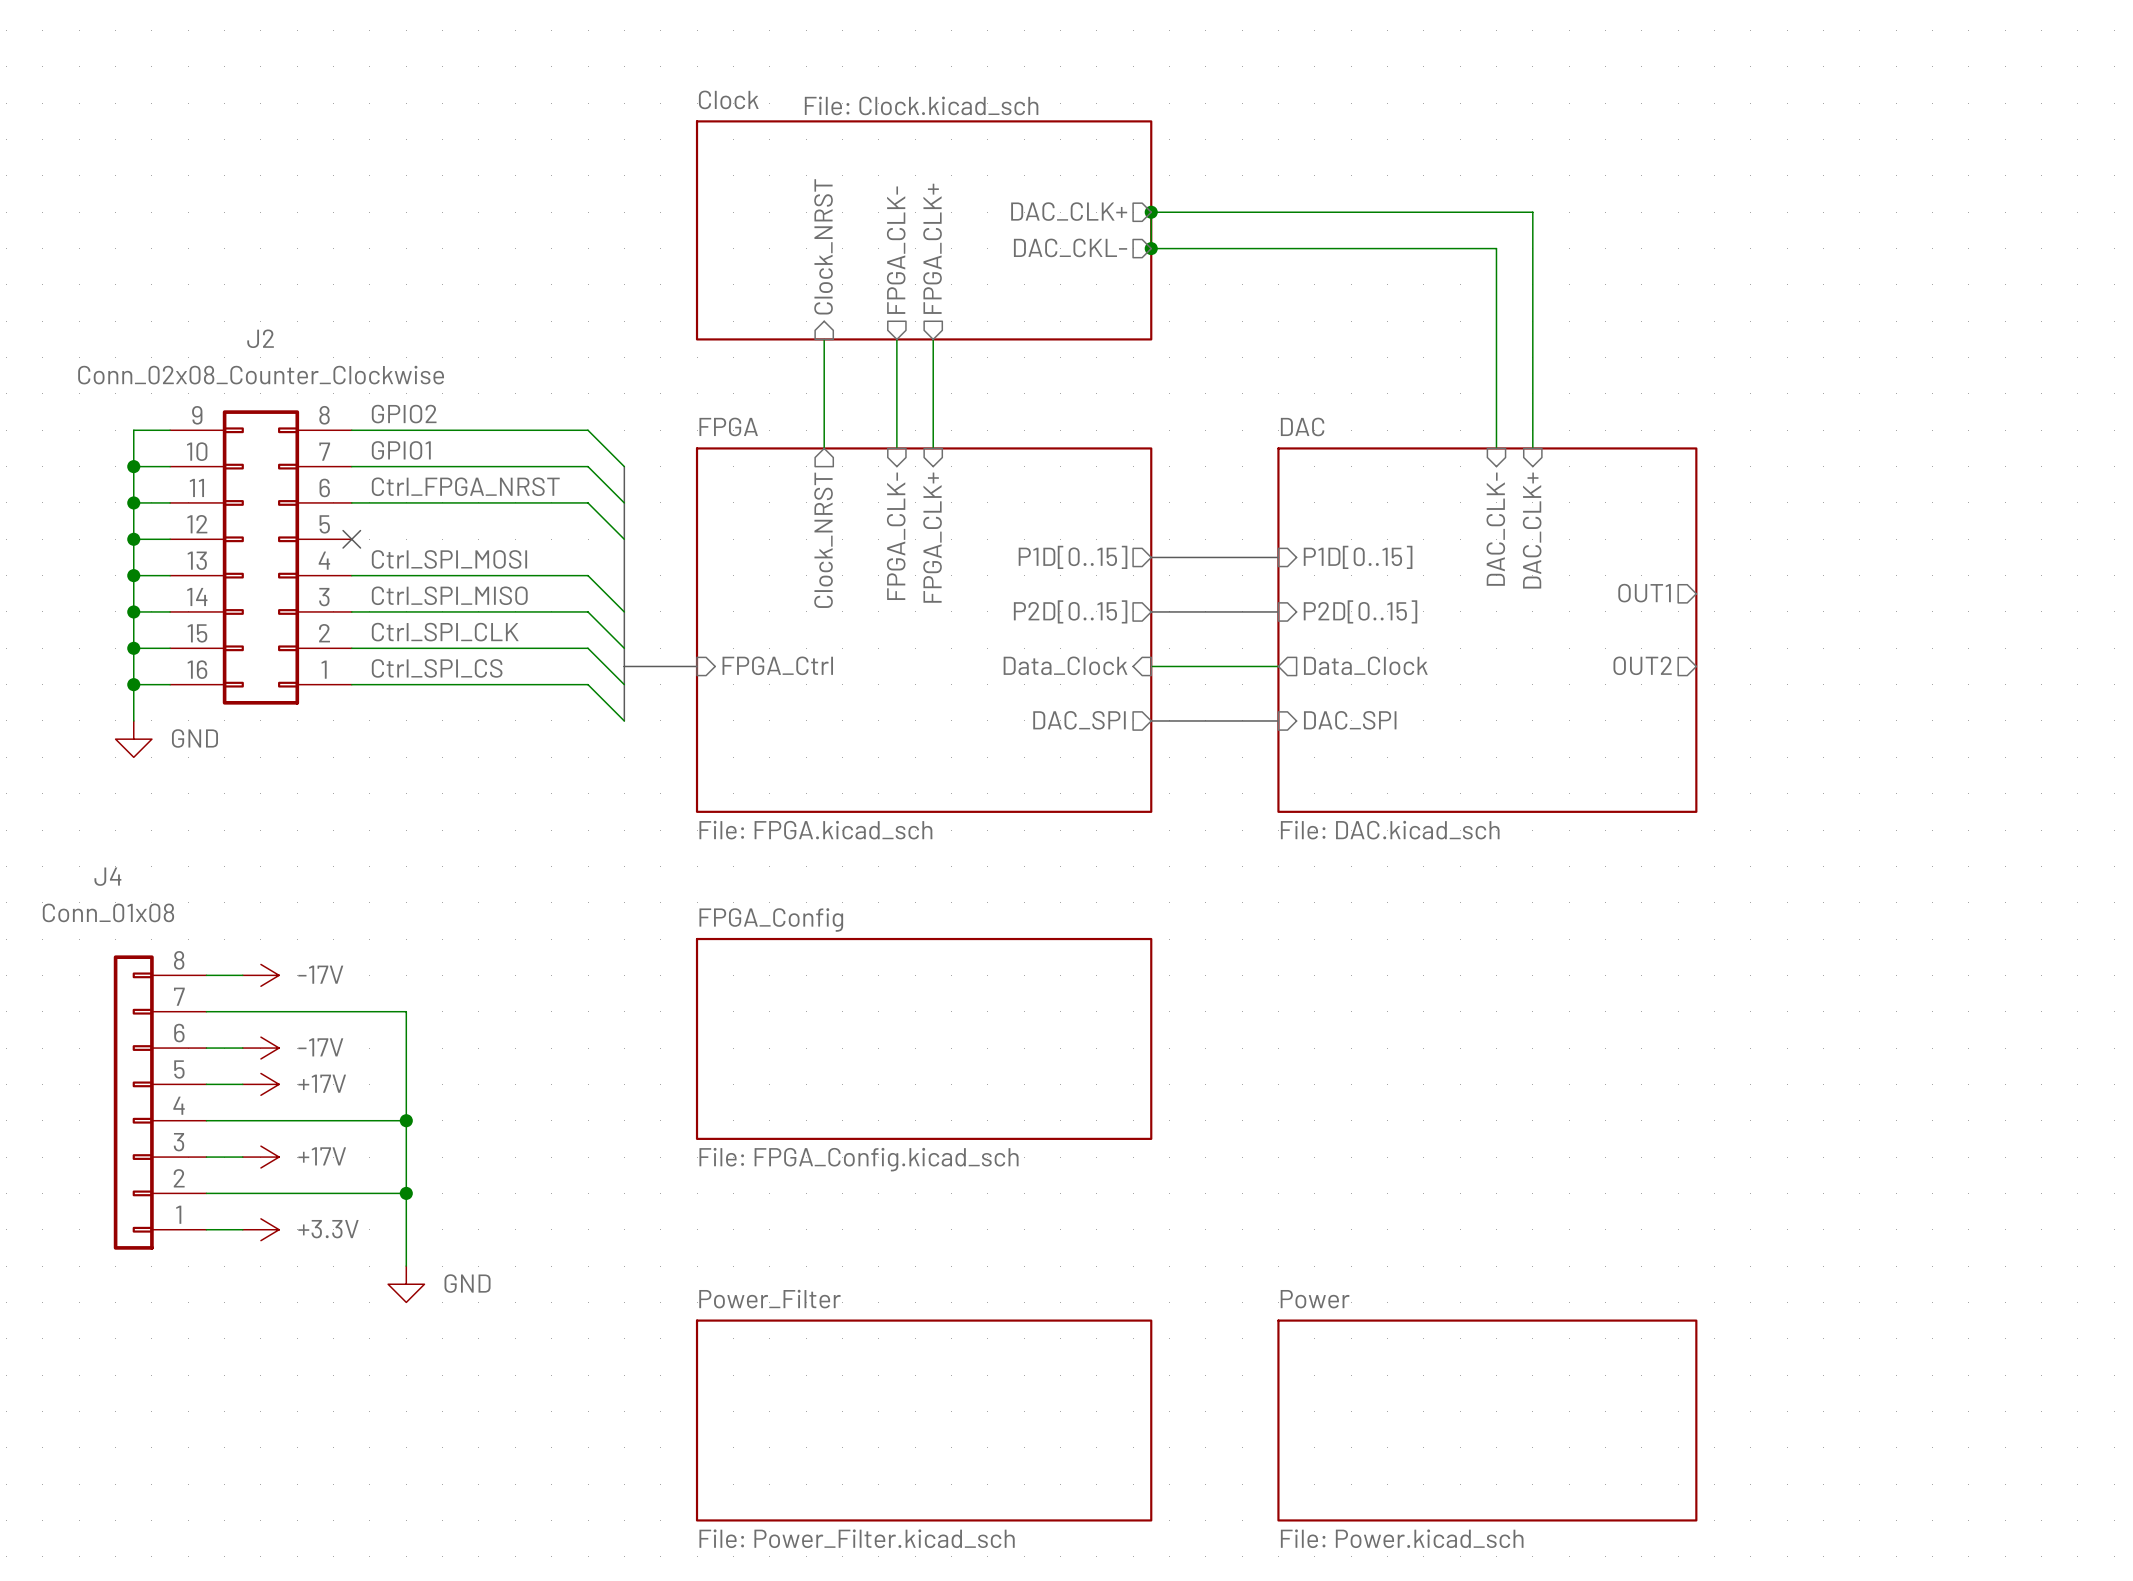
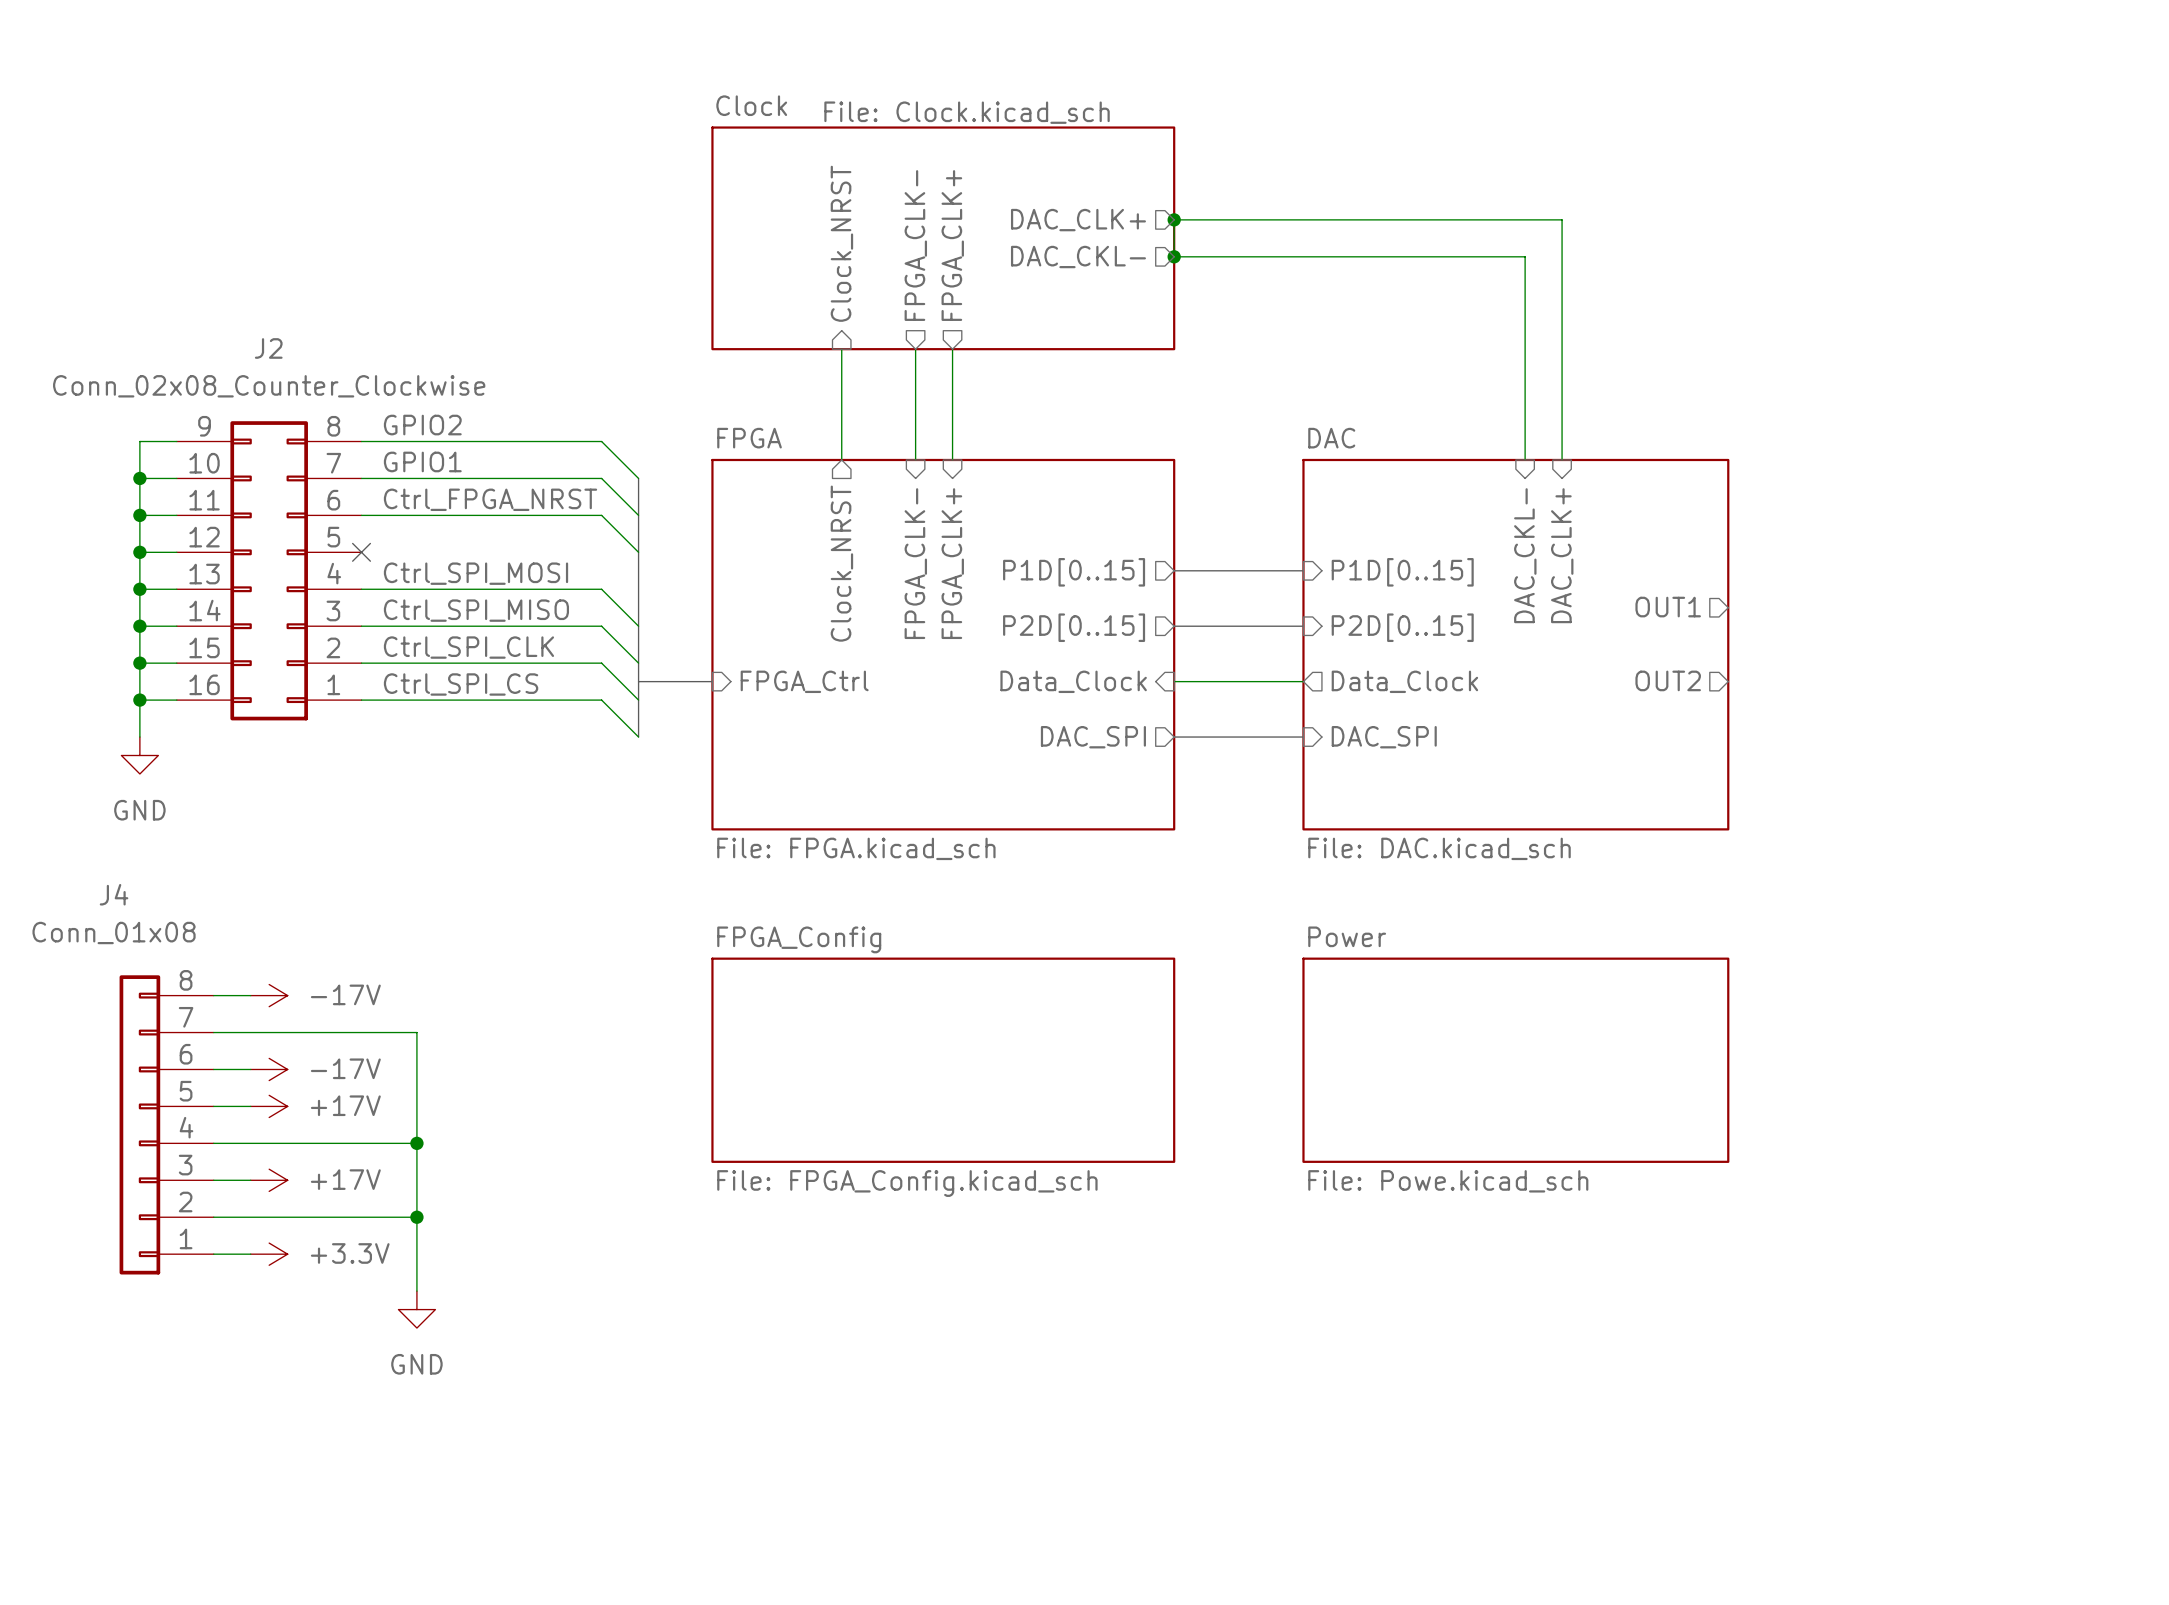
sheet pin: DAC_CLK- (1495, 529) -> DAC_CKL- (1525, 555)
power symbol text position: GND (194, 738) -> GND (139, 810)
sheet Power: none -> File: Powe.kicad_sch (1515, 1060)
power symbol text position: GND (467, 1283) -> GND (416, 1364)
sheet Power_Filter: File: Power_Filter.kicad_sch (924, 1420) -> none
sheet Power: File: Power.kicad_sch (1487, 1420) -> none

